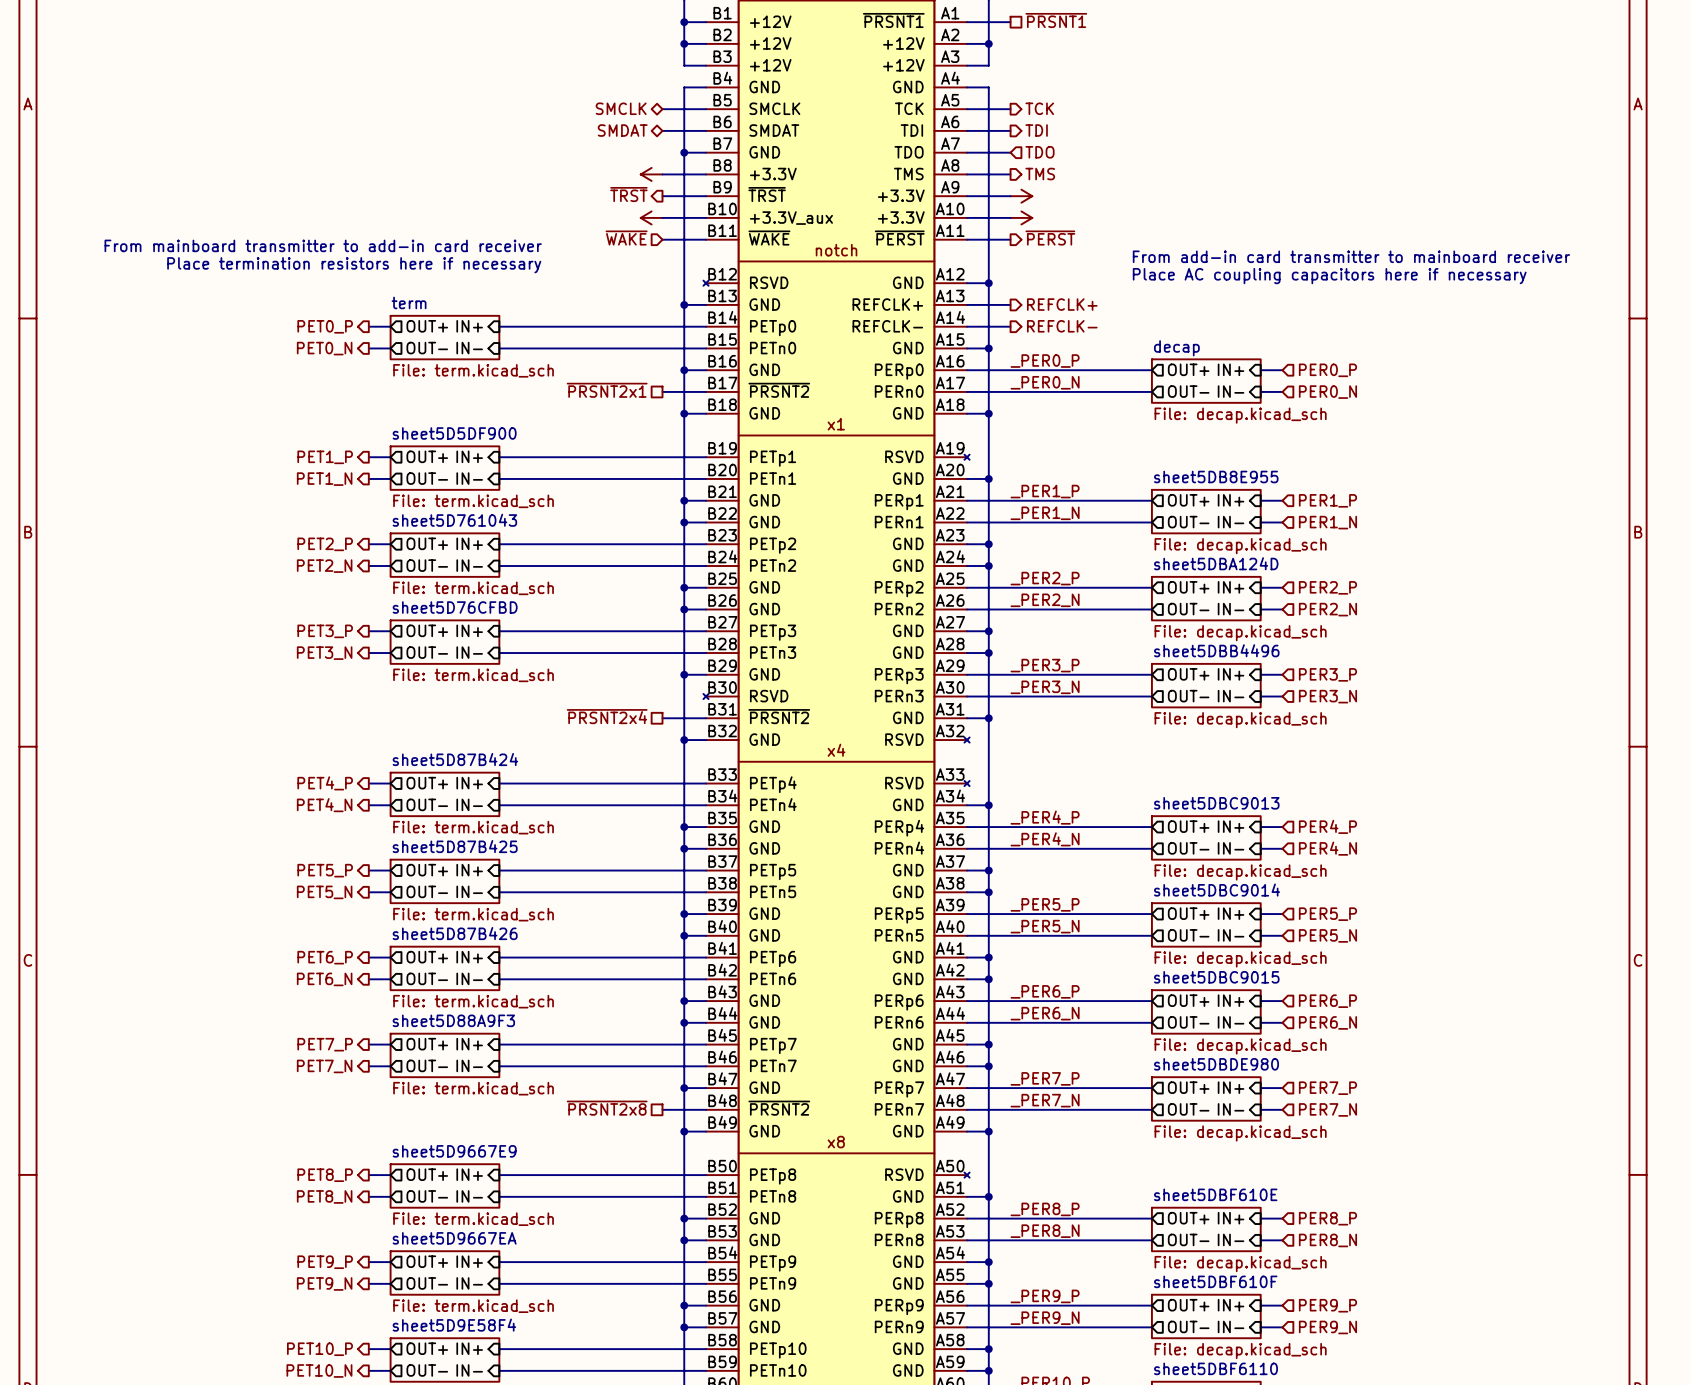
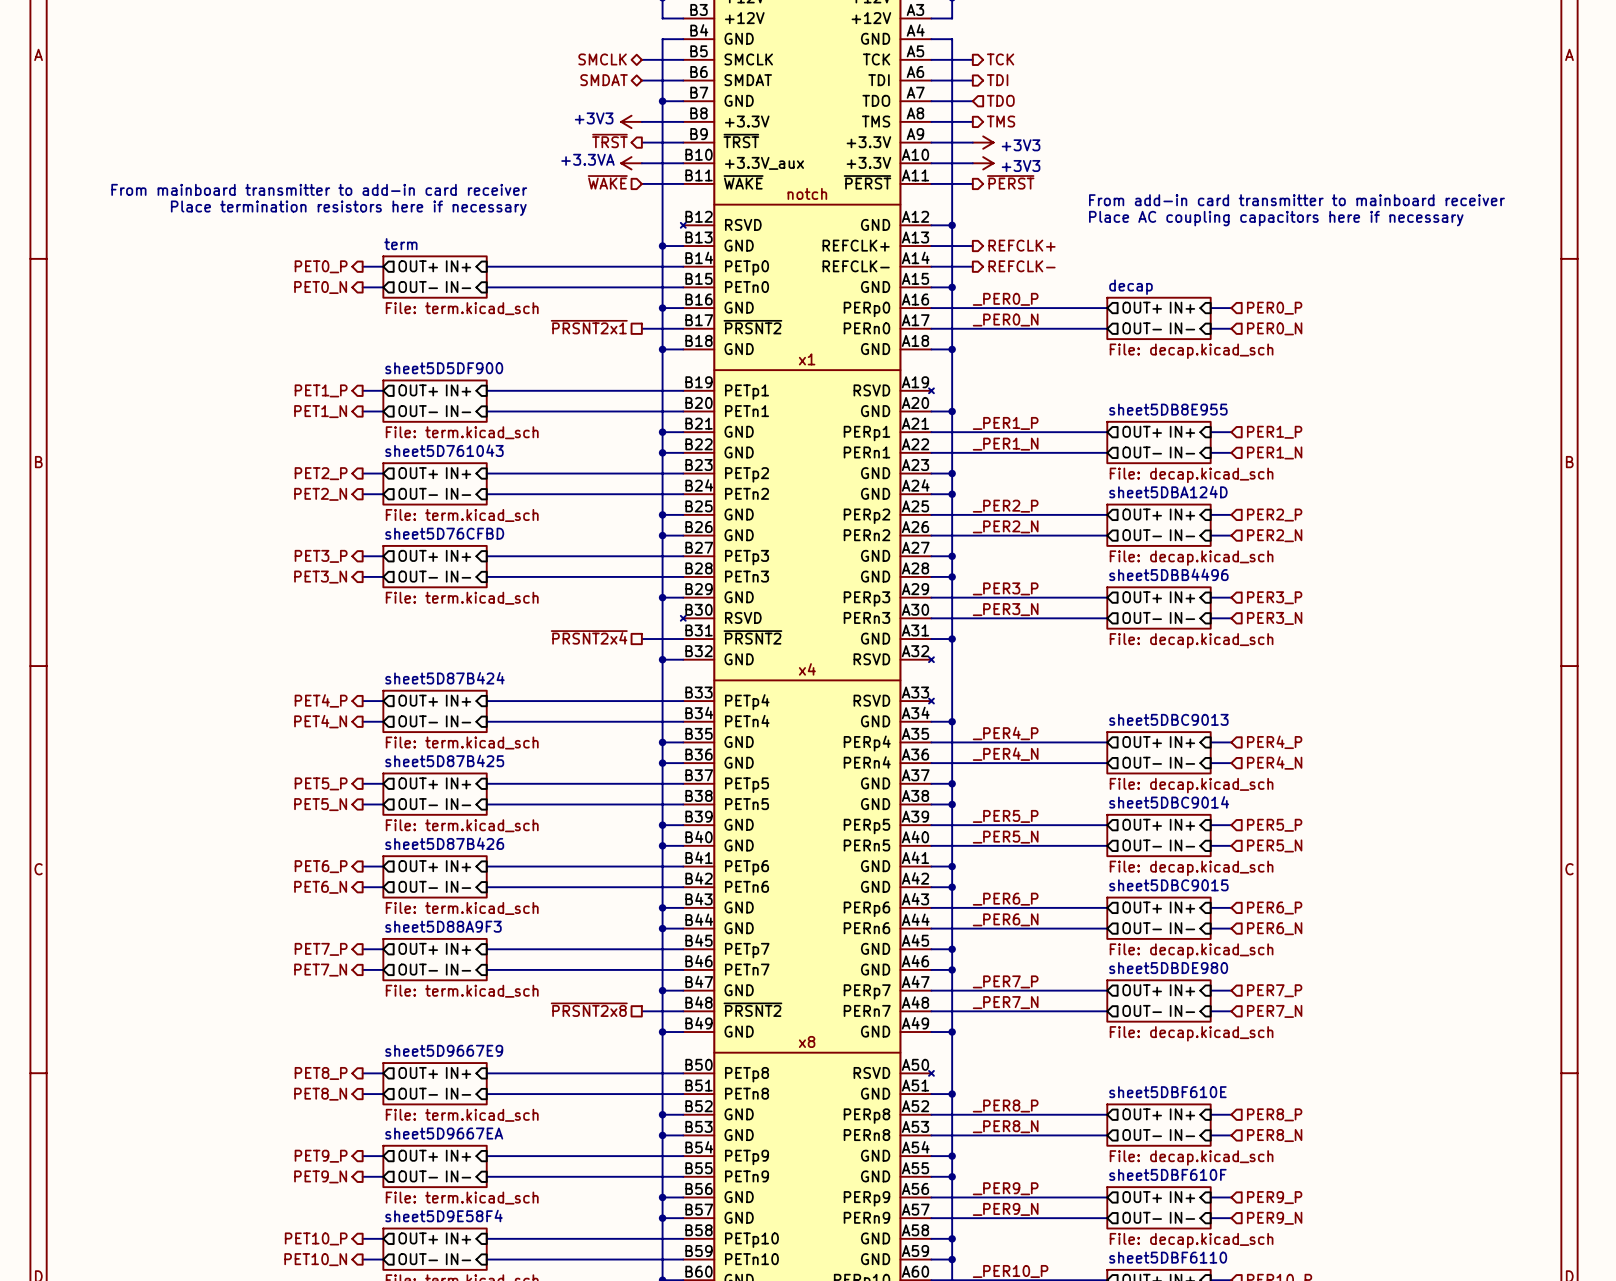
power symbol text: none -> +3V3 (594, 118)
power symbol text: none -> +3V3 (1021, 145)
power symbol text: none -> +3.3VA (587, 159)
power symbol text: none -> +3V3 (1021, 165)

